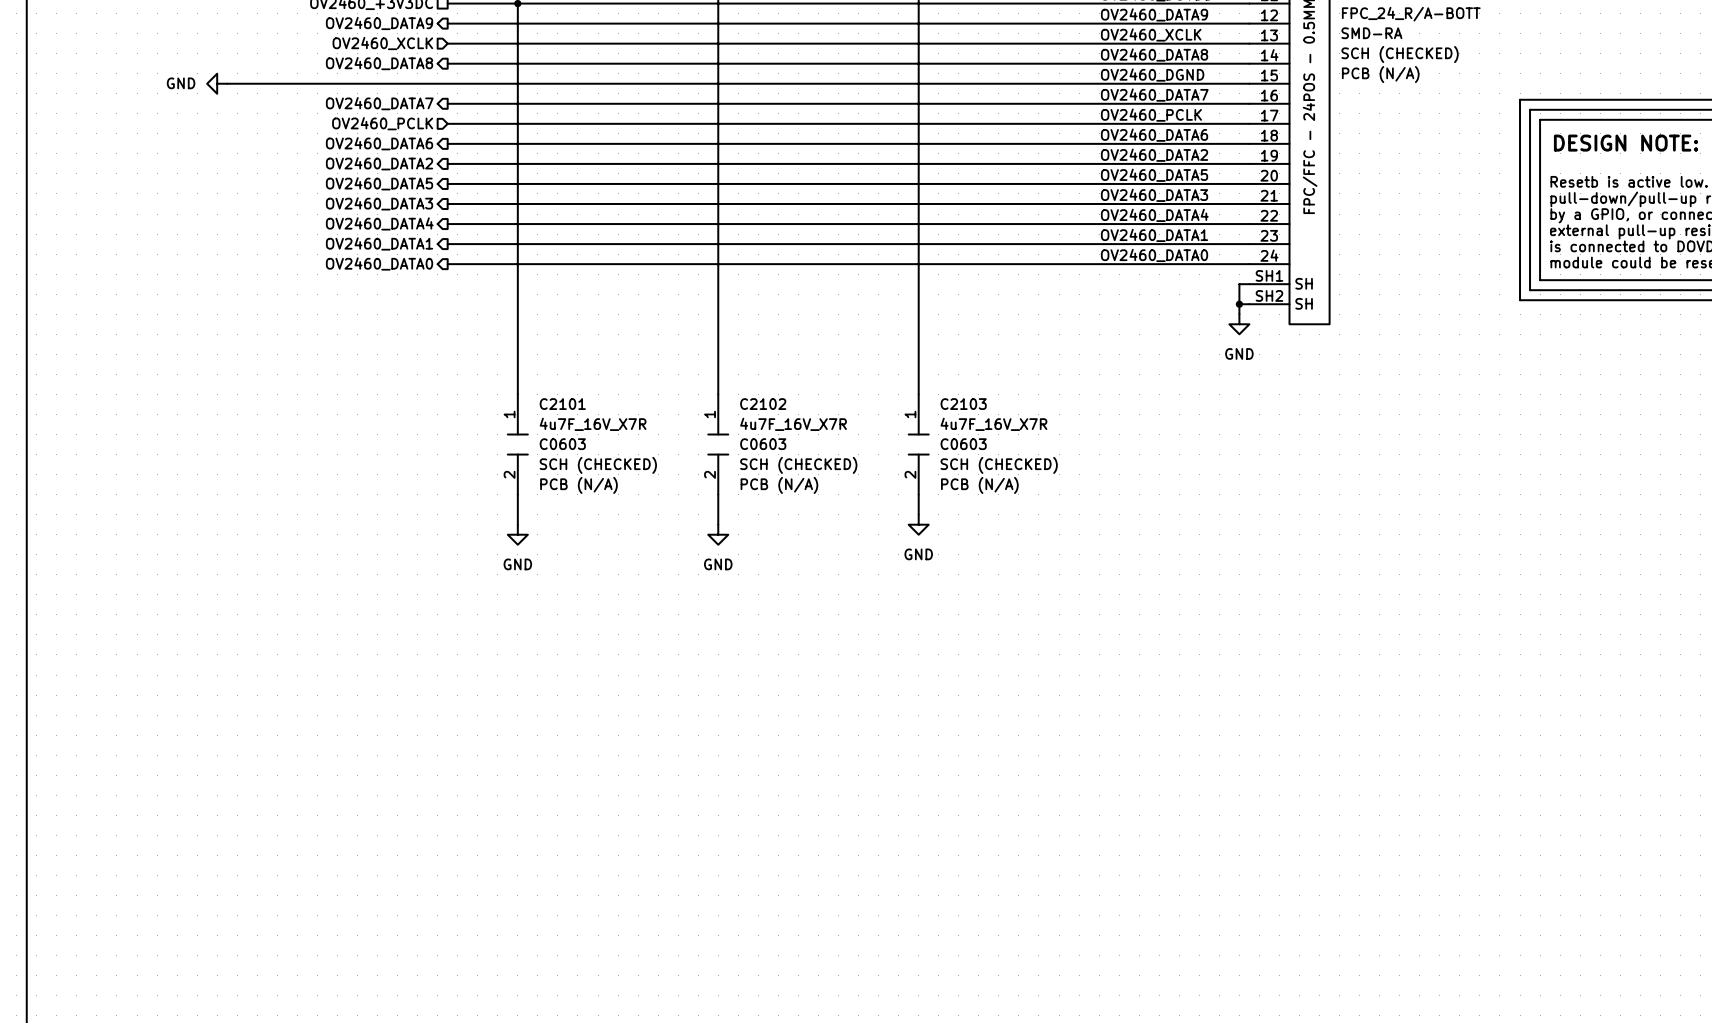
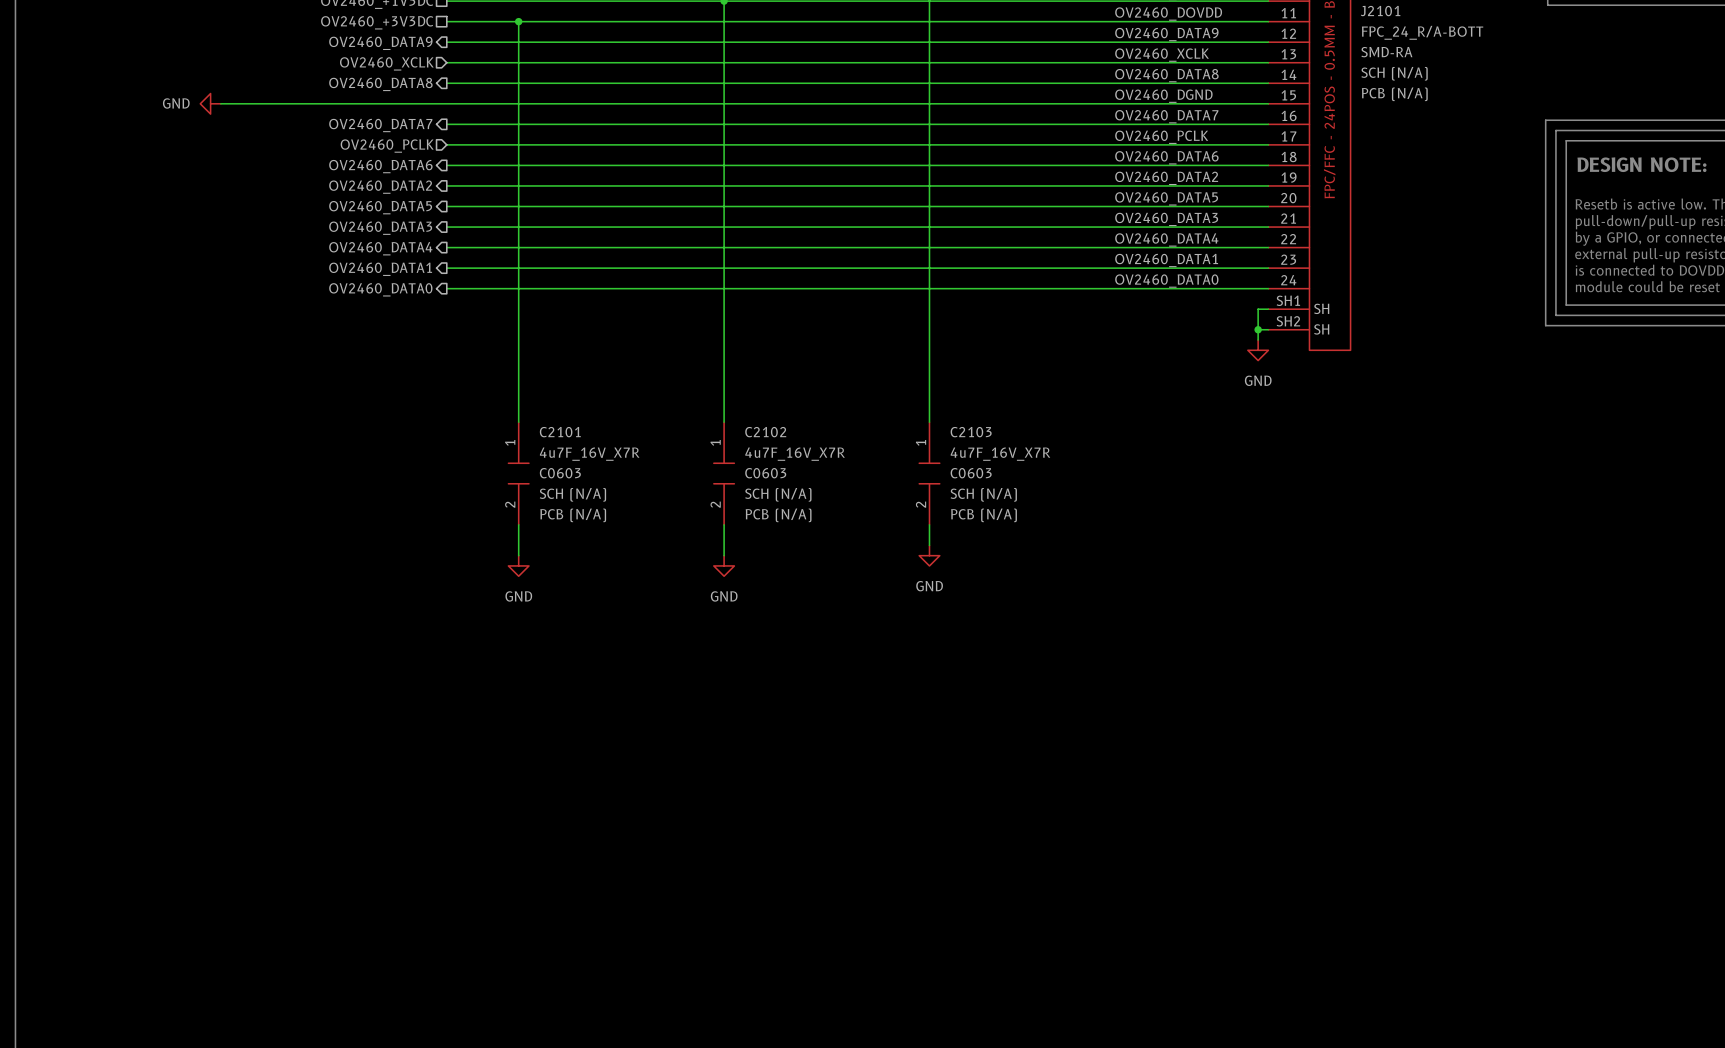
J2101 text: SCH (CHECKED) (1400, 54) -> SCH (N/A) (1394, 73)
C2101 text: SCH (CHECKED) (598, 465) -> SCH (N/A) (572, 494)
C2102 text: SCH (CHECKED) (798, 465) -> SCH (N/A) (778, 494)
C2103 text: SCH (CHECKED) (999, 465) -> SCH (N/A) (983, 494)

